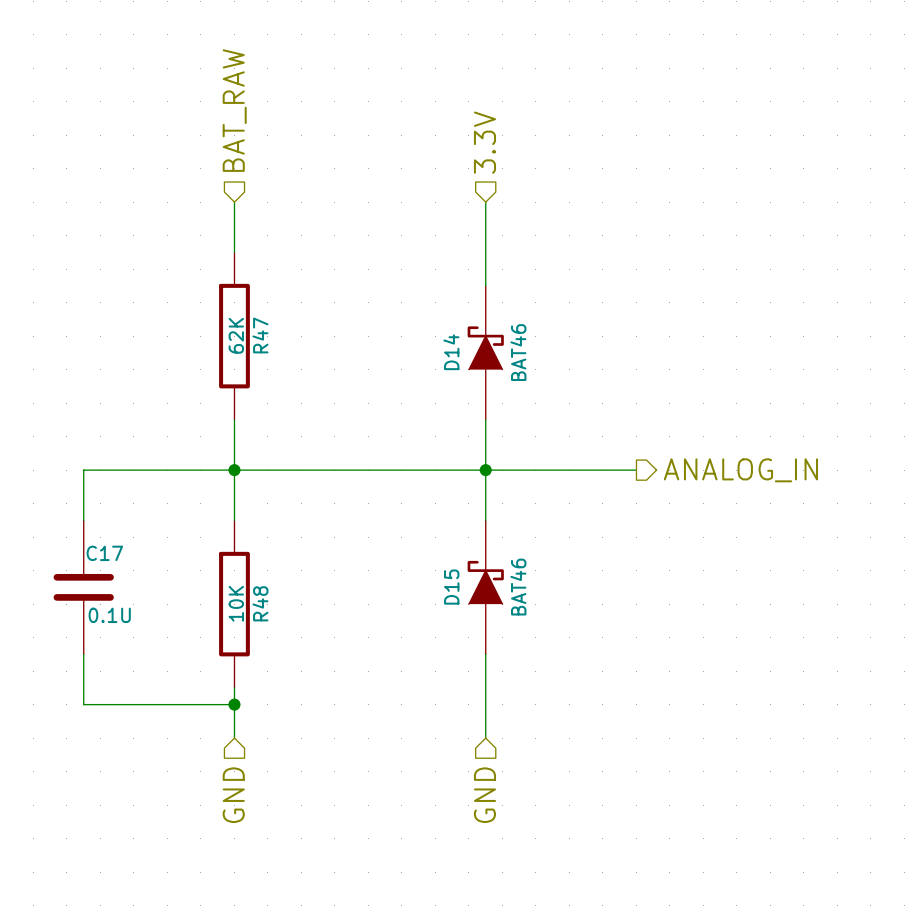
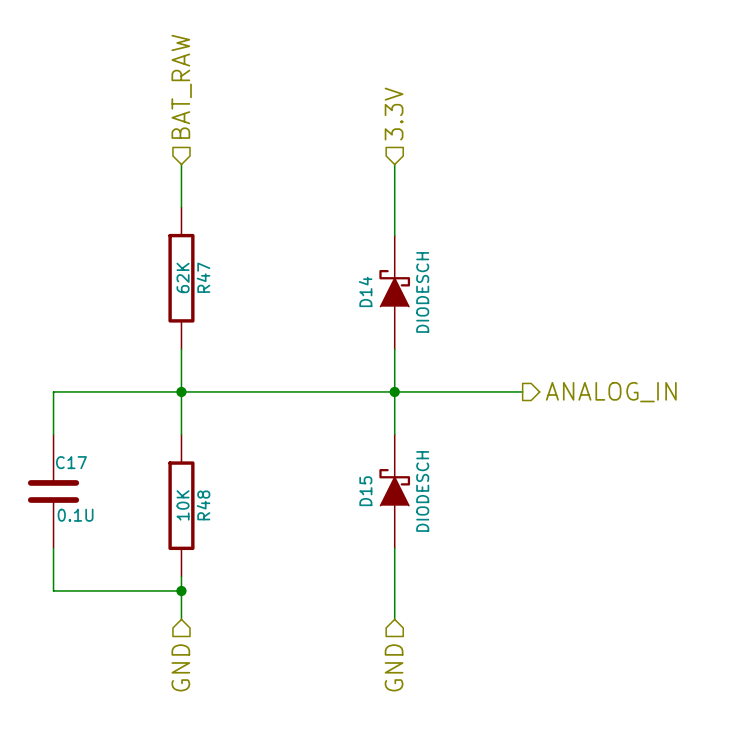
D14 value: BAT46 (518, 352) -> DIODESCH (422, 292)
D15 value: BAT46 (518, 587) -> DIODESCH (422, 491)

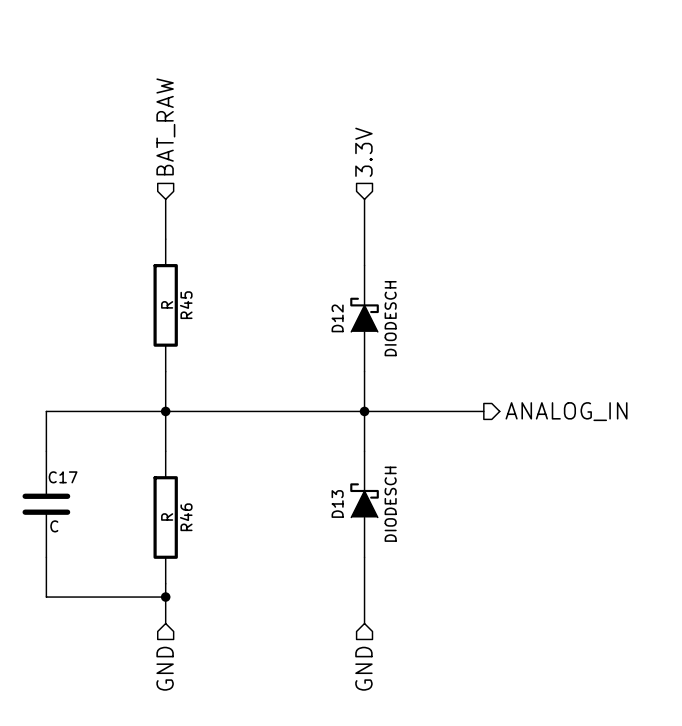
R47 value: 62K (183, 277) -> R (167, 304)
R47 name: R47 (203, 277) -> R45 (186, 305)
D14 name: D14 (365, 291) -> D12 (337, 318)
D15 name: D15 (365, 491) -> D13 (337, 503)
R48 value: 10K (183, 505) -> R (167, 516)
R48 name: R48 (203, 505) -> R46 (186, 517)
C17 value: 0.1U (75, 515) -> C (54, 526)

